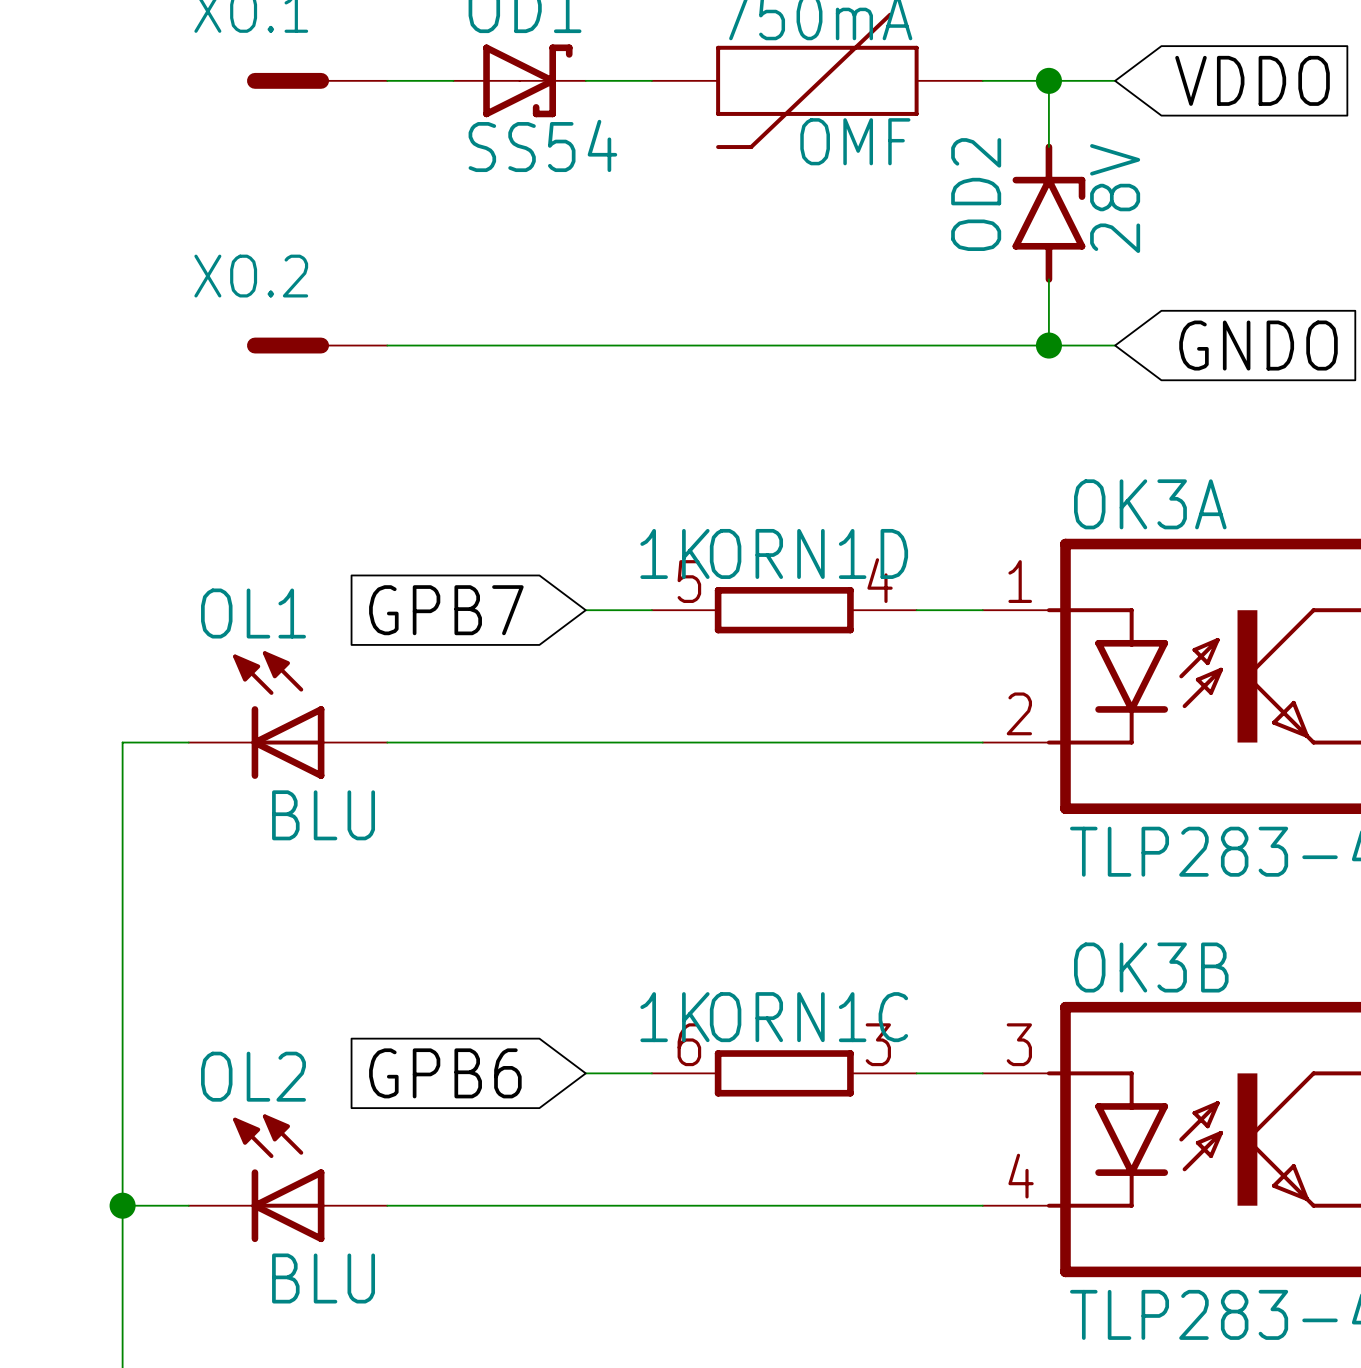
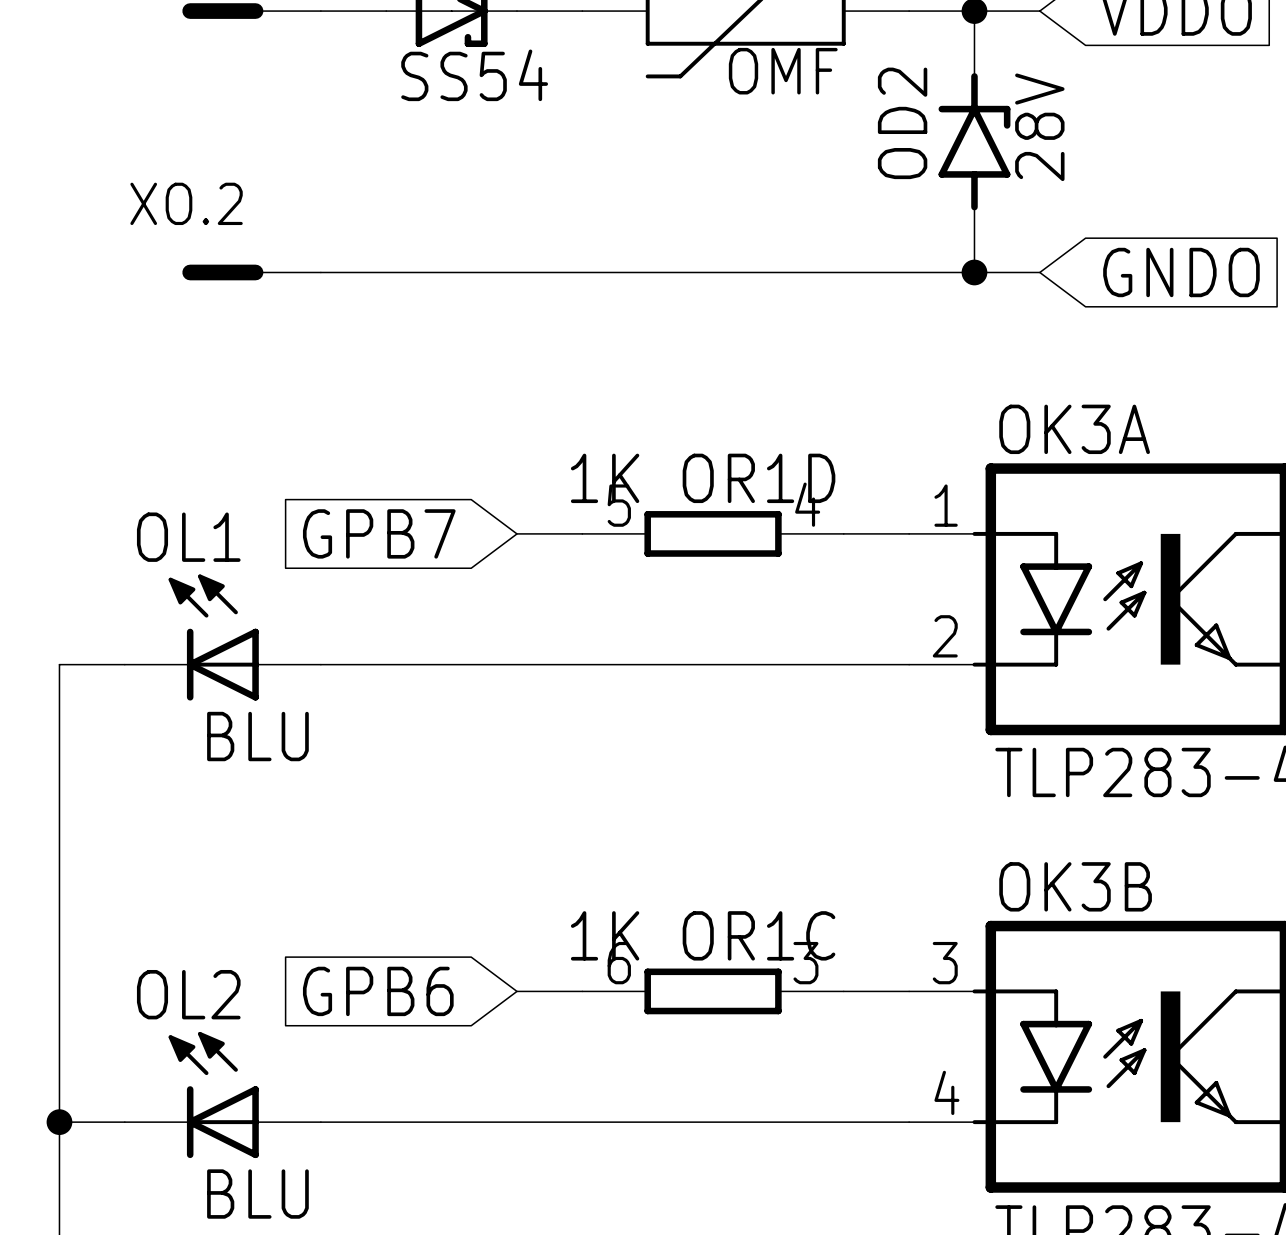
ORN1D name: ORN1D (808, 553) -> OR1D (759, 478)
ORN1C name: ORN1C (808, 1017) -> OR1C (759, 935)

